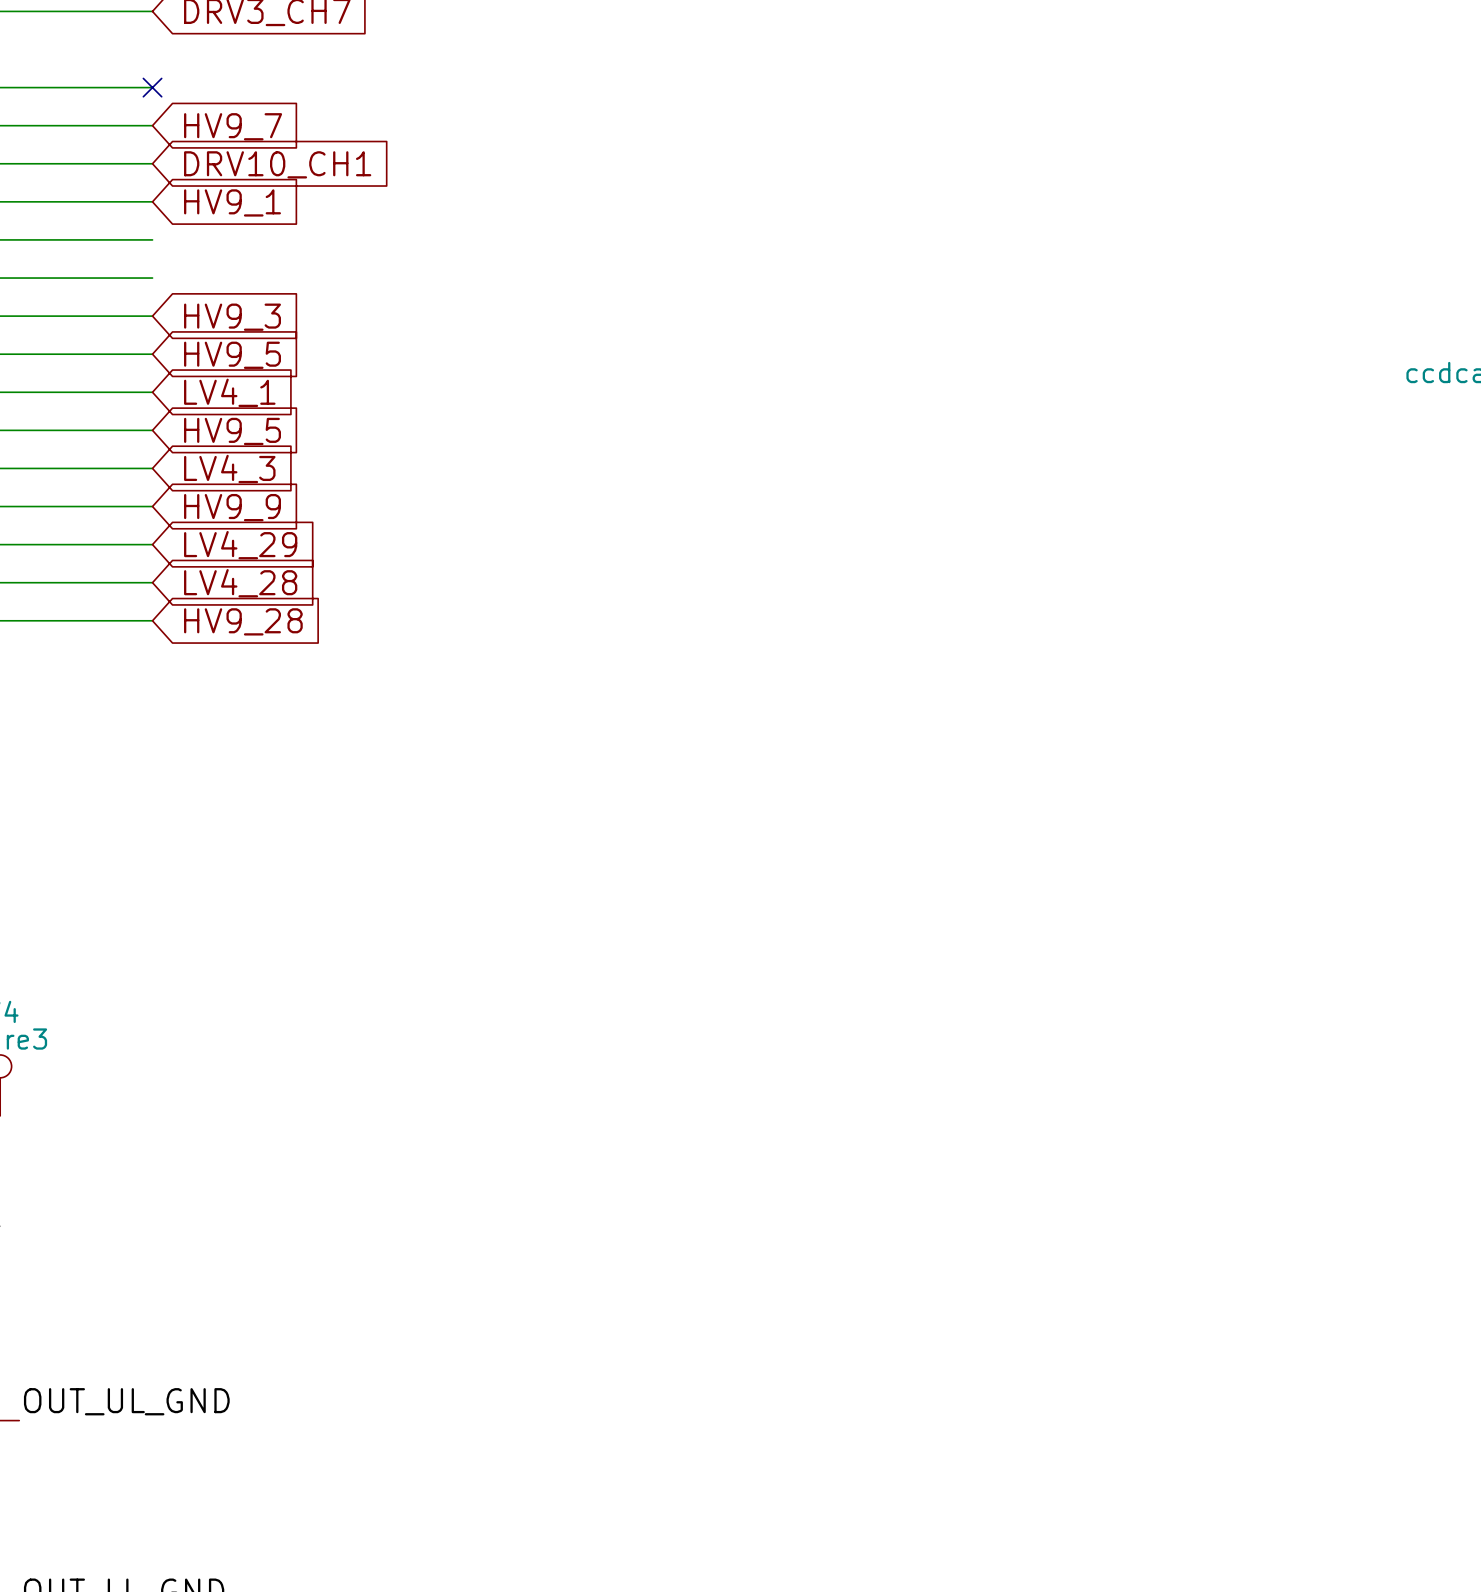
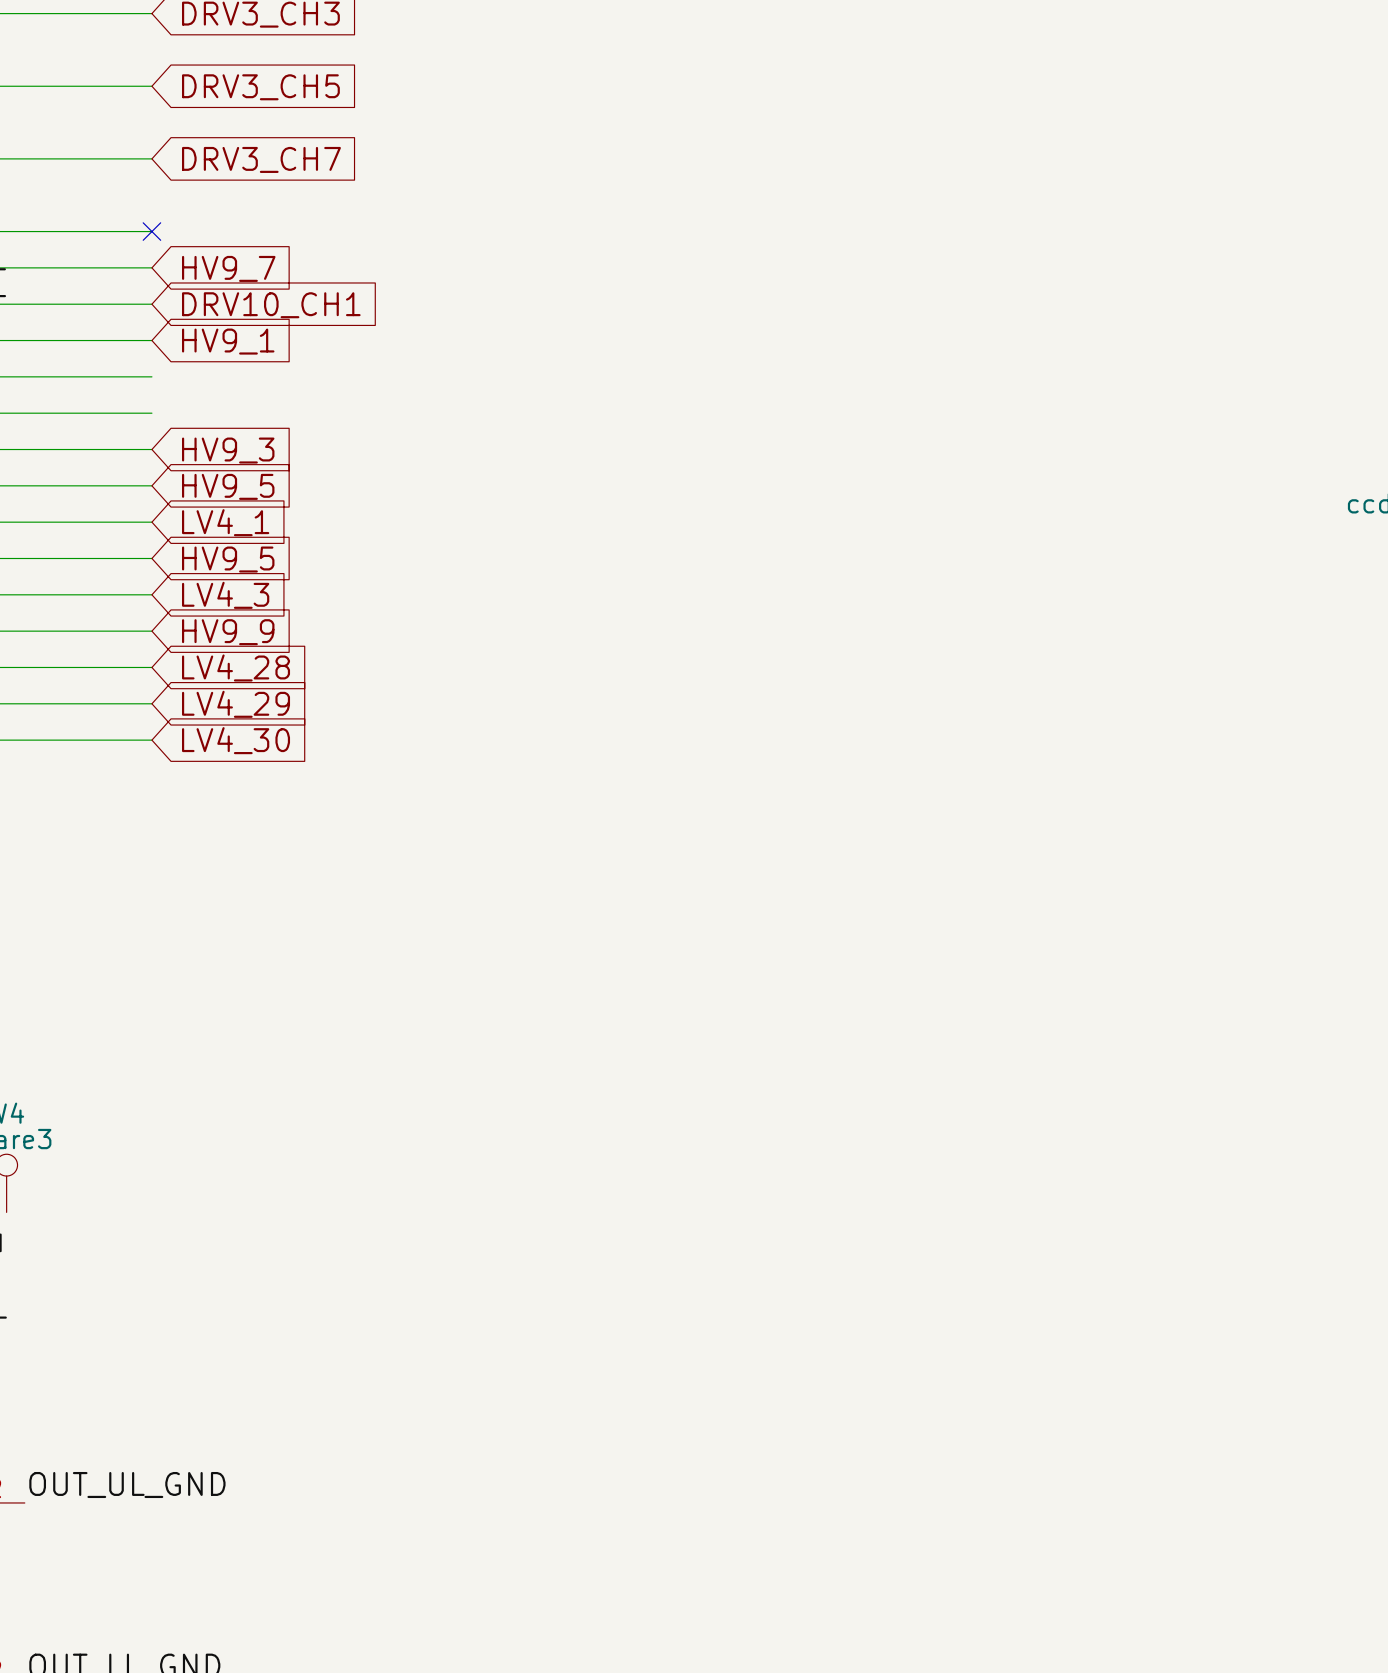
global label: LV4_29 (240, 545) -> LV4_28 (236, 667)
global label: LV4_28 (240, 583) -> LV4_29 (236, 704)
global label: HV9_28 (243, 621) -> LV4_30 (236, 740)

